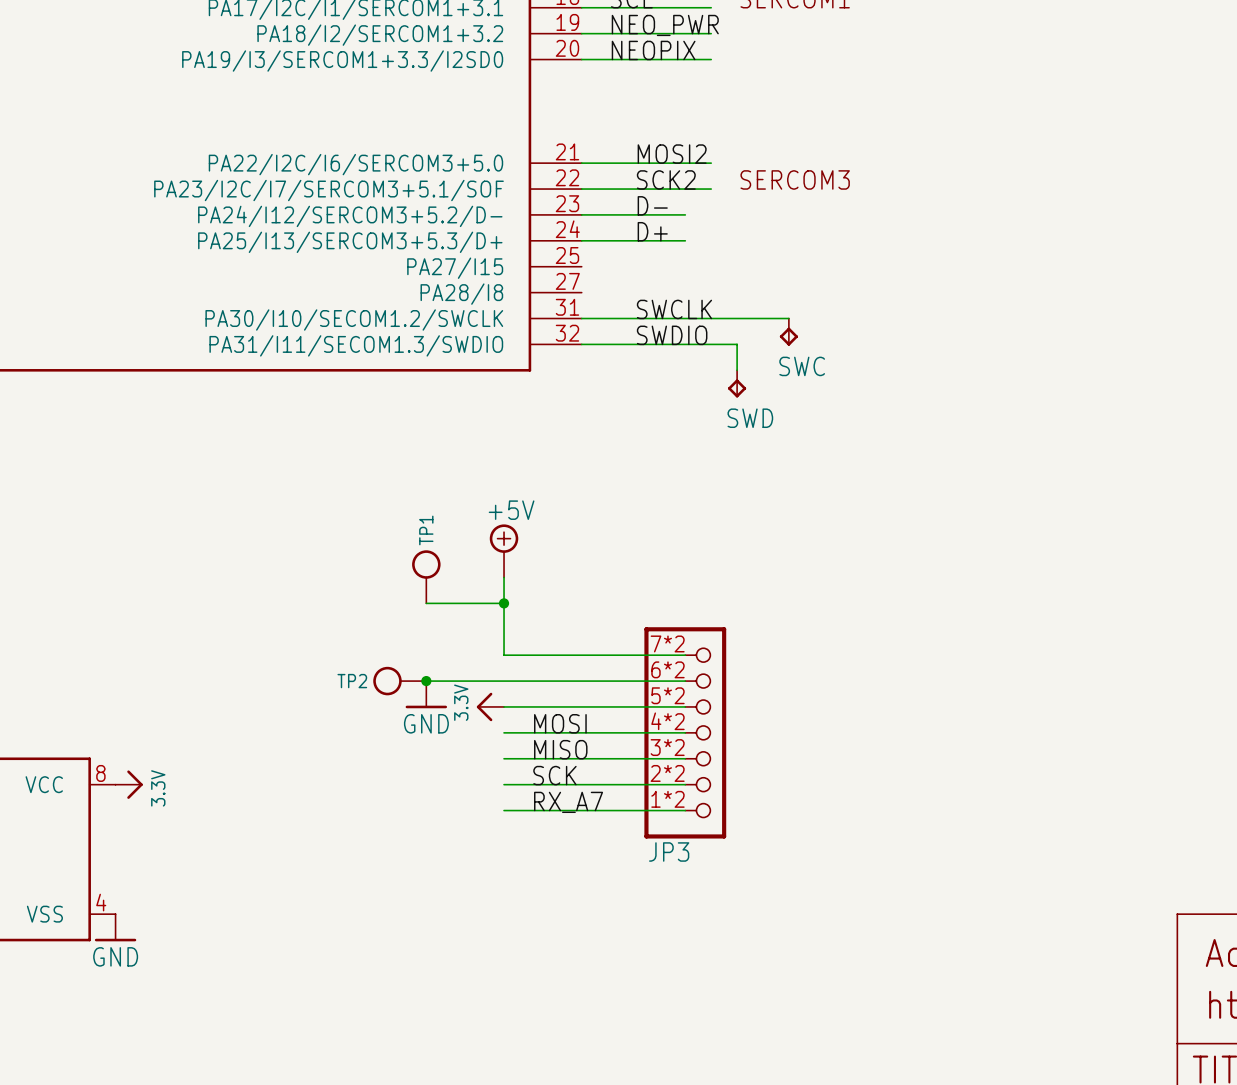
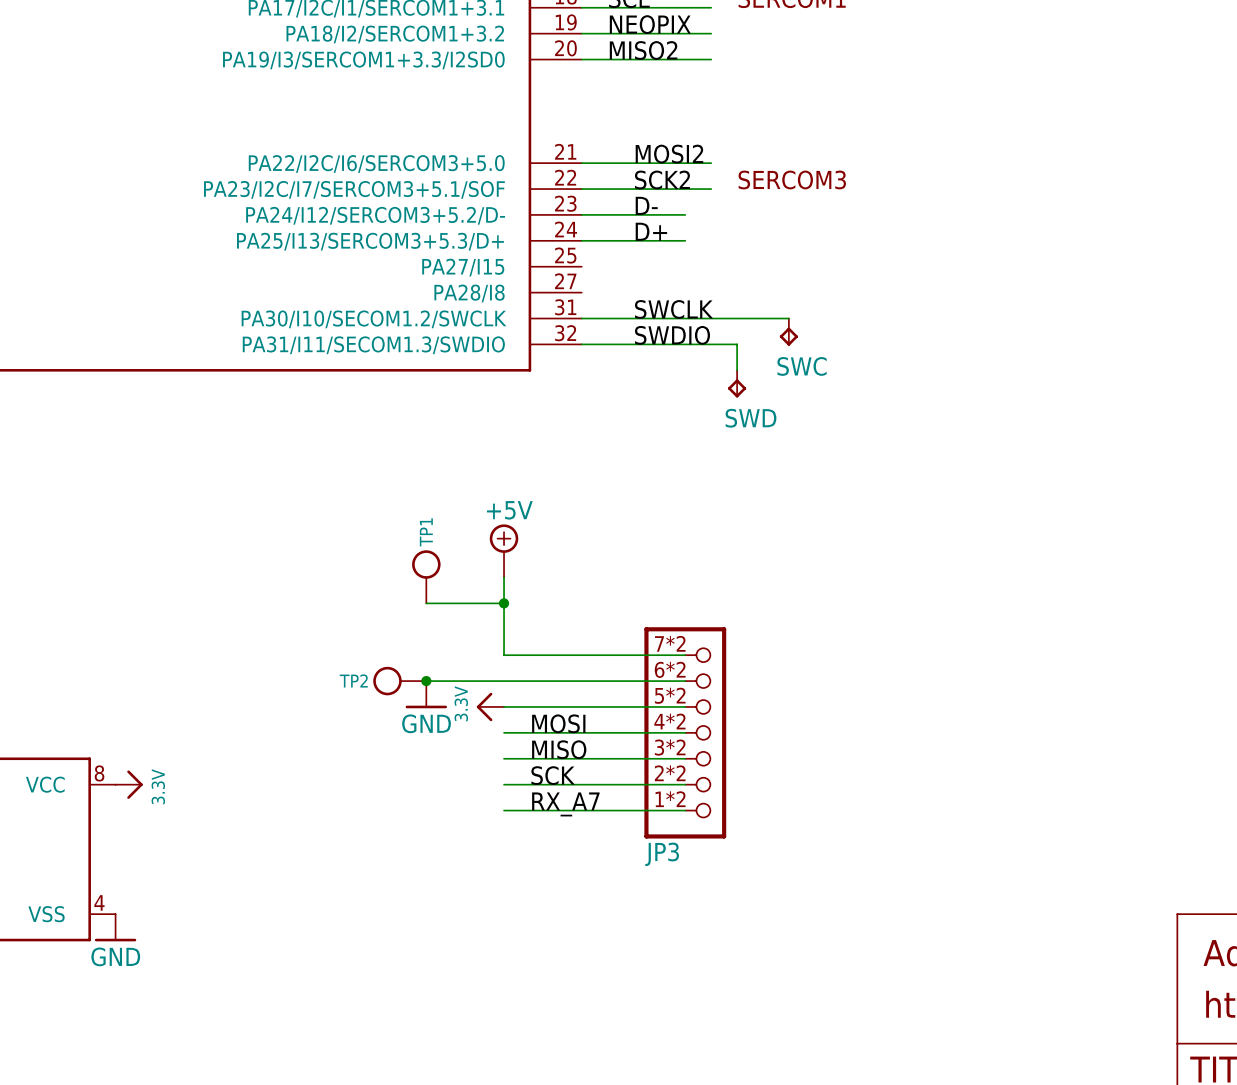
label: NEO_PWR (665, 25) -> NEOPIX (650, 24)
label: NEOPIX (653, 50) -> MISO2 (643, 50)

